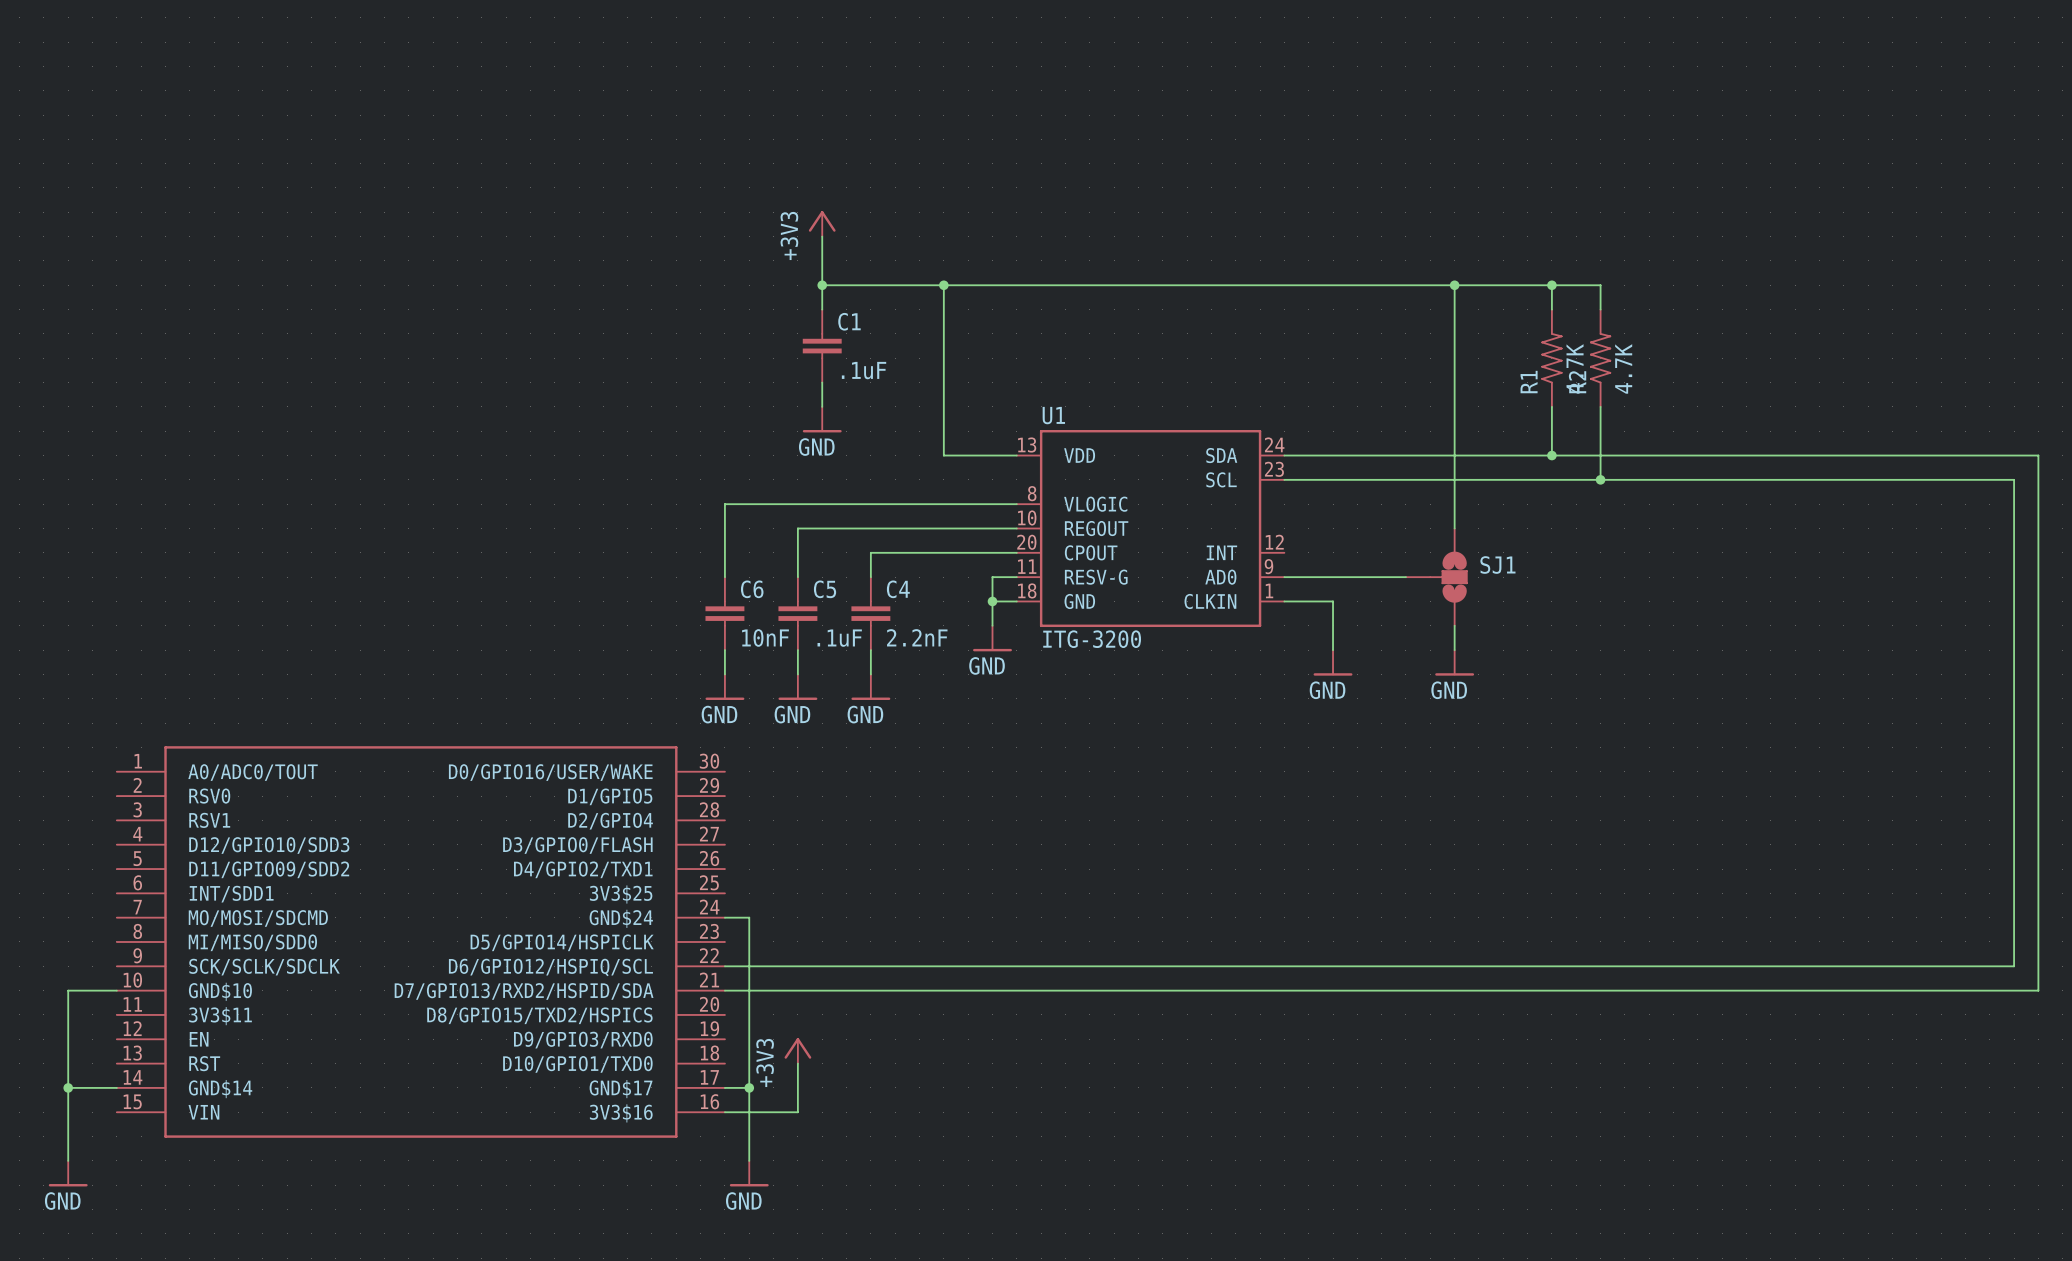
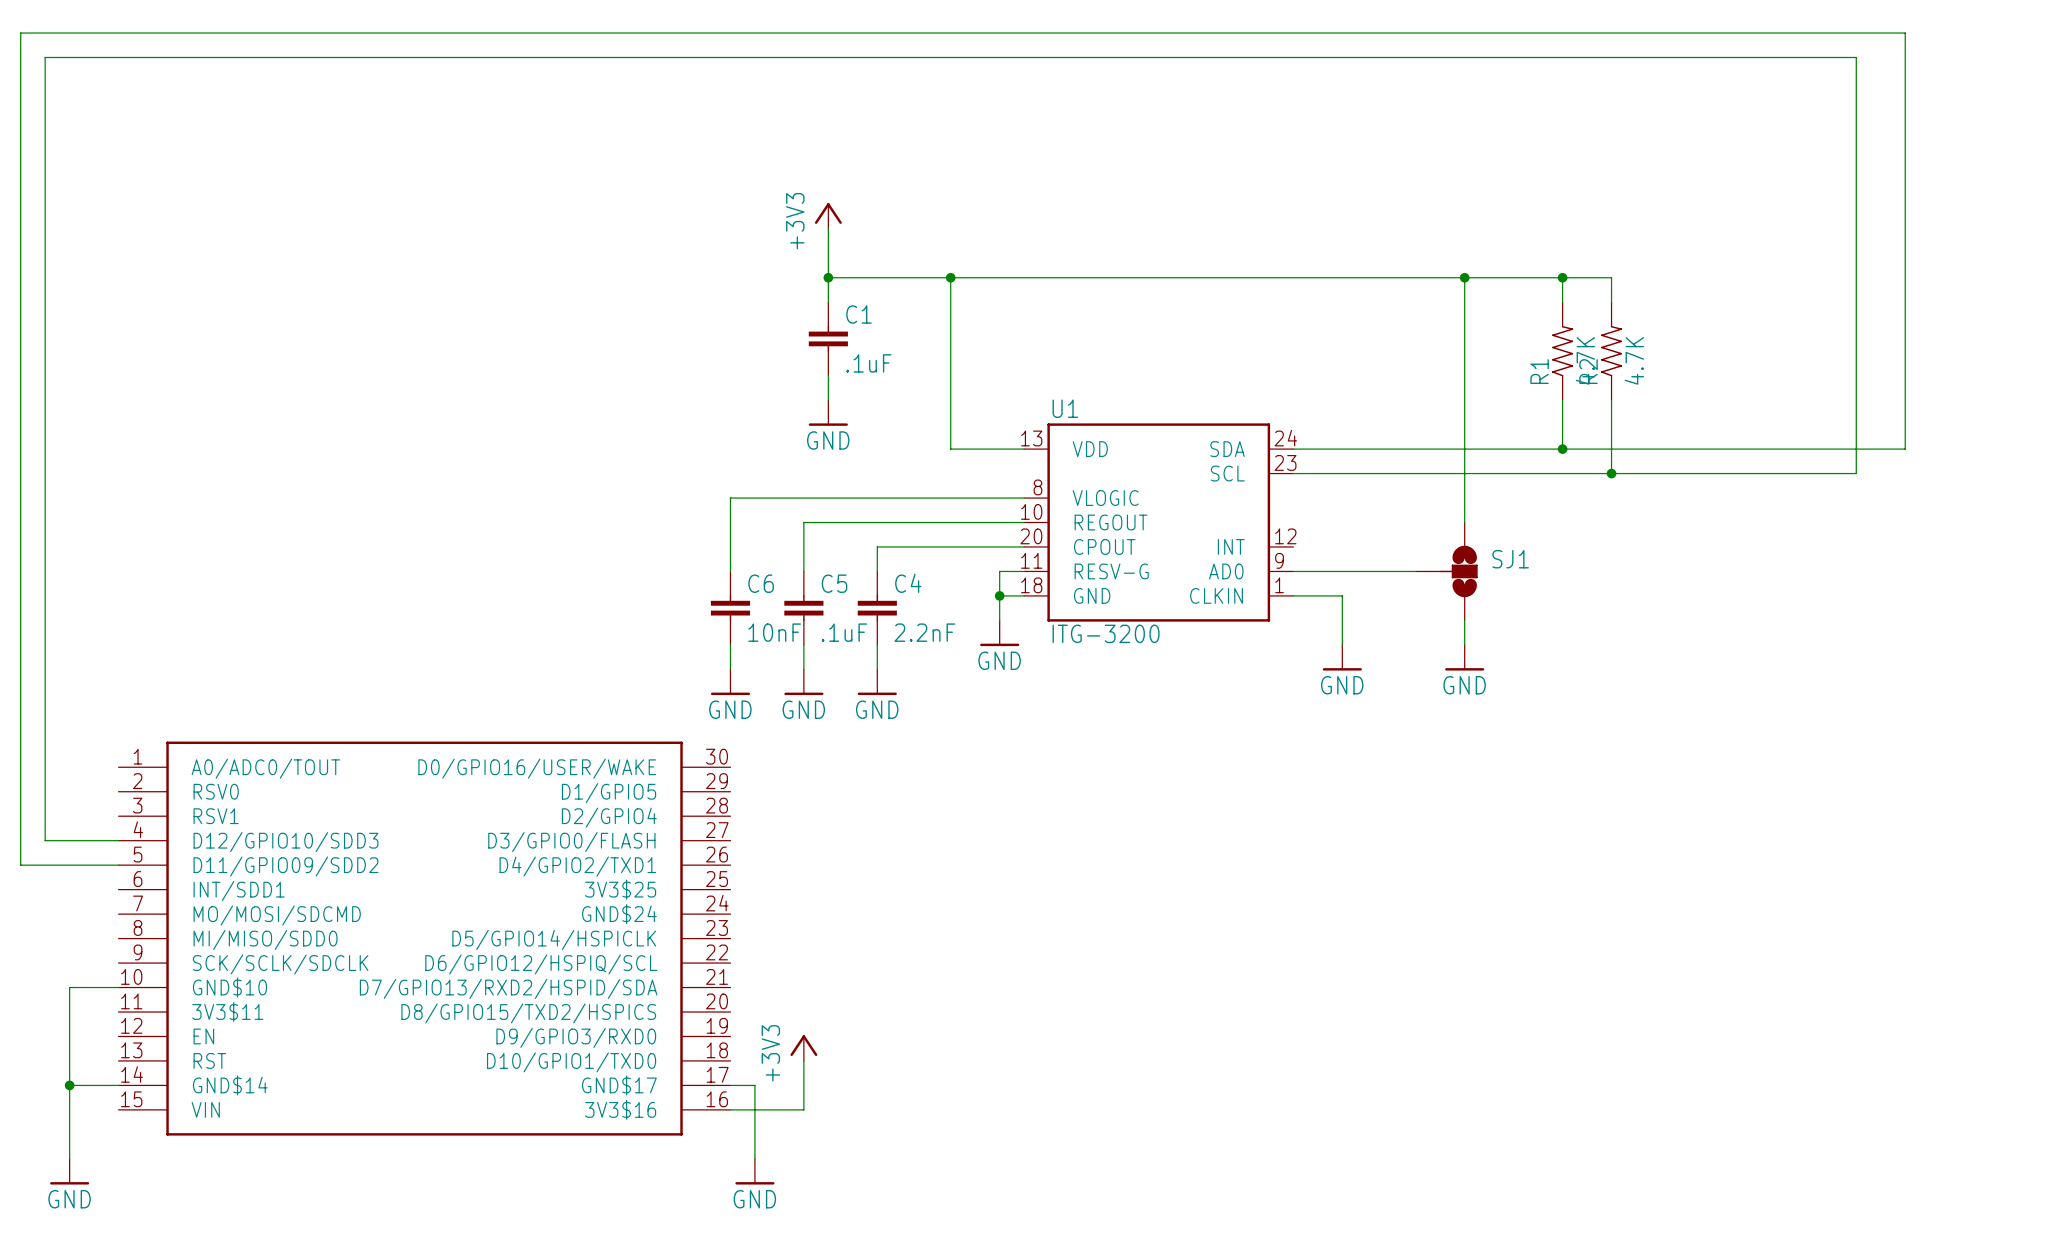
wire: (1892, 455) (2038, 455) (2038, 990) (724, 990) -> (1905, 449) (1905, 33) (20, 33) (20, 865) (118, 865)
wire: (1843, 479) (2014, 479) (2014, 966) (724, 966) -> (1856, 473) (1856, 57) (45, 57) (45, 840) (118, 840)
wire: (724, 917) (749, 917) (749, 1087) -> none
junction: (749, 1087) -> none

